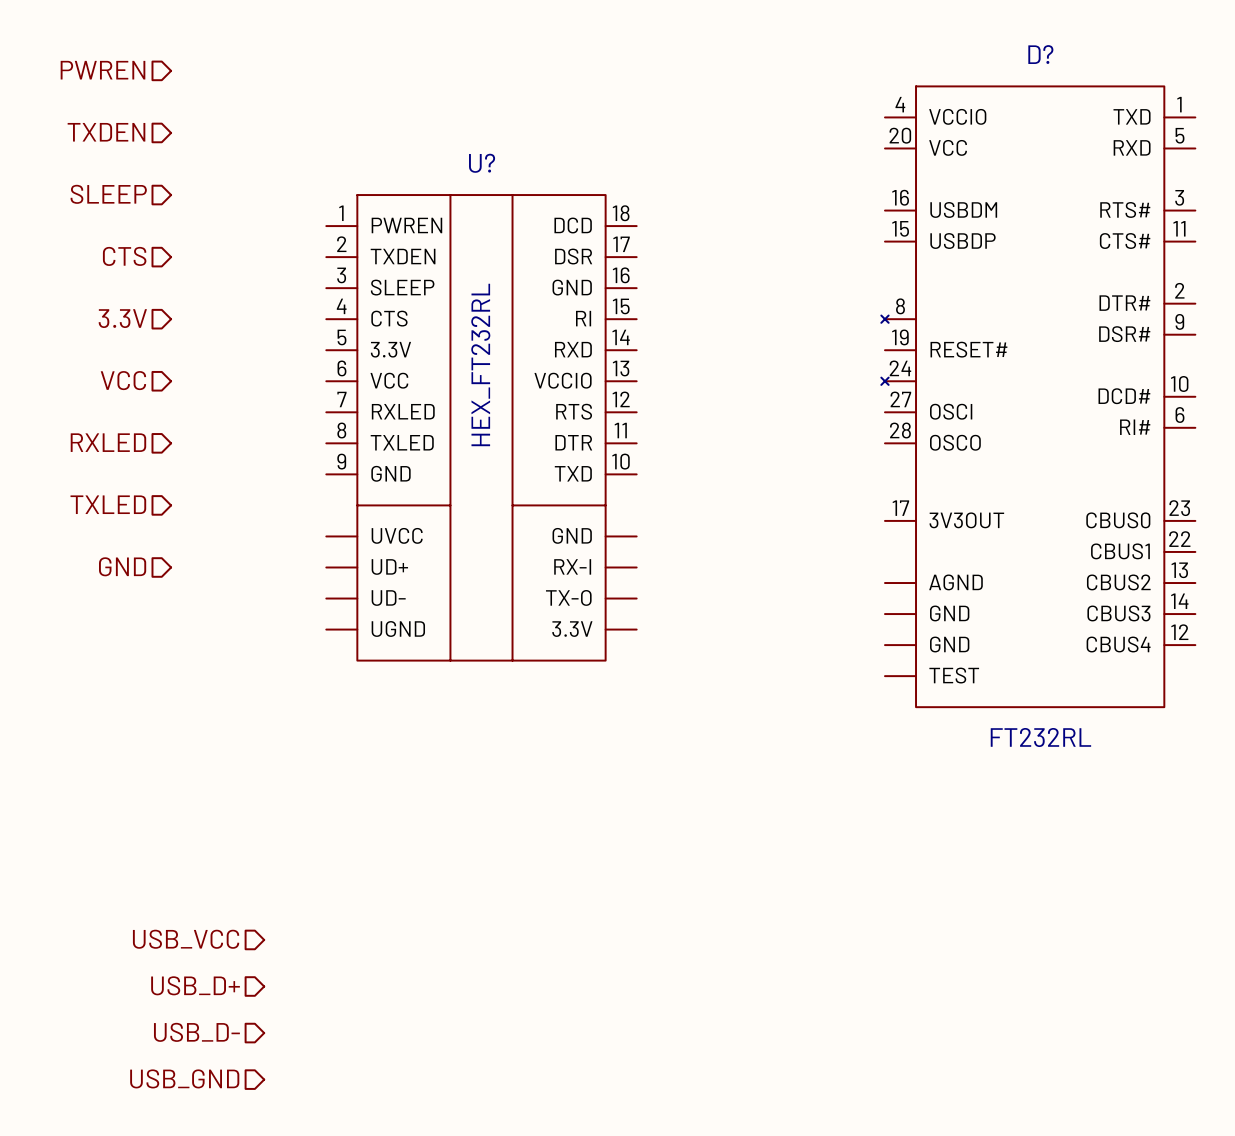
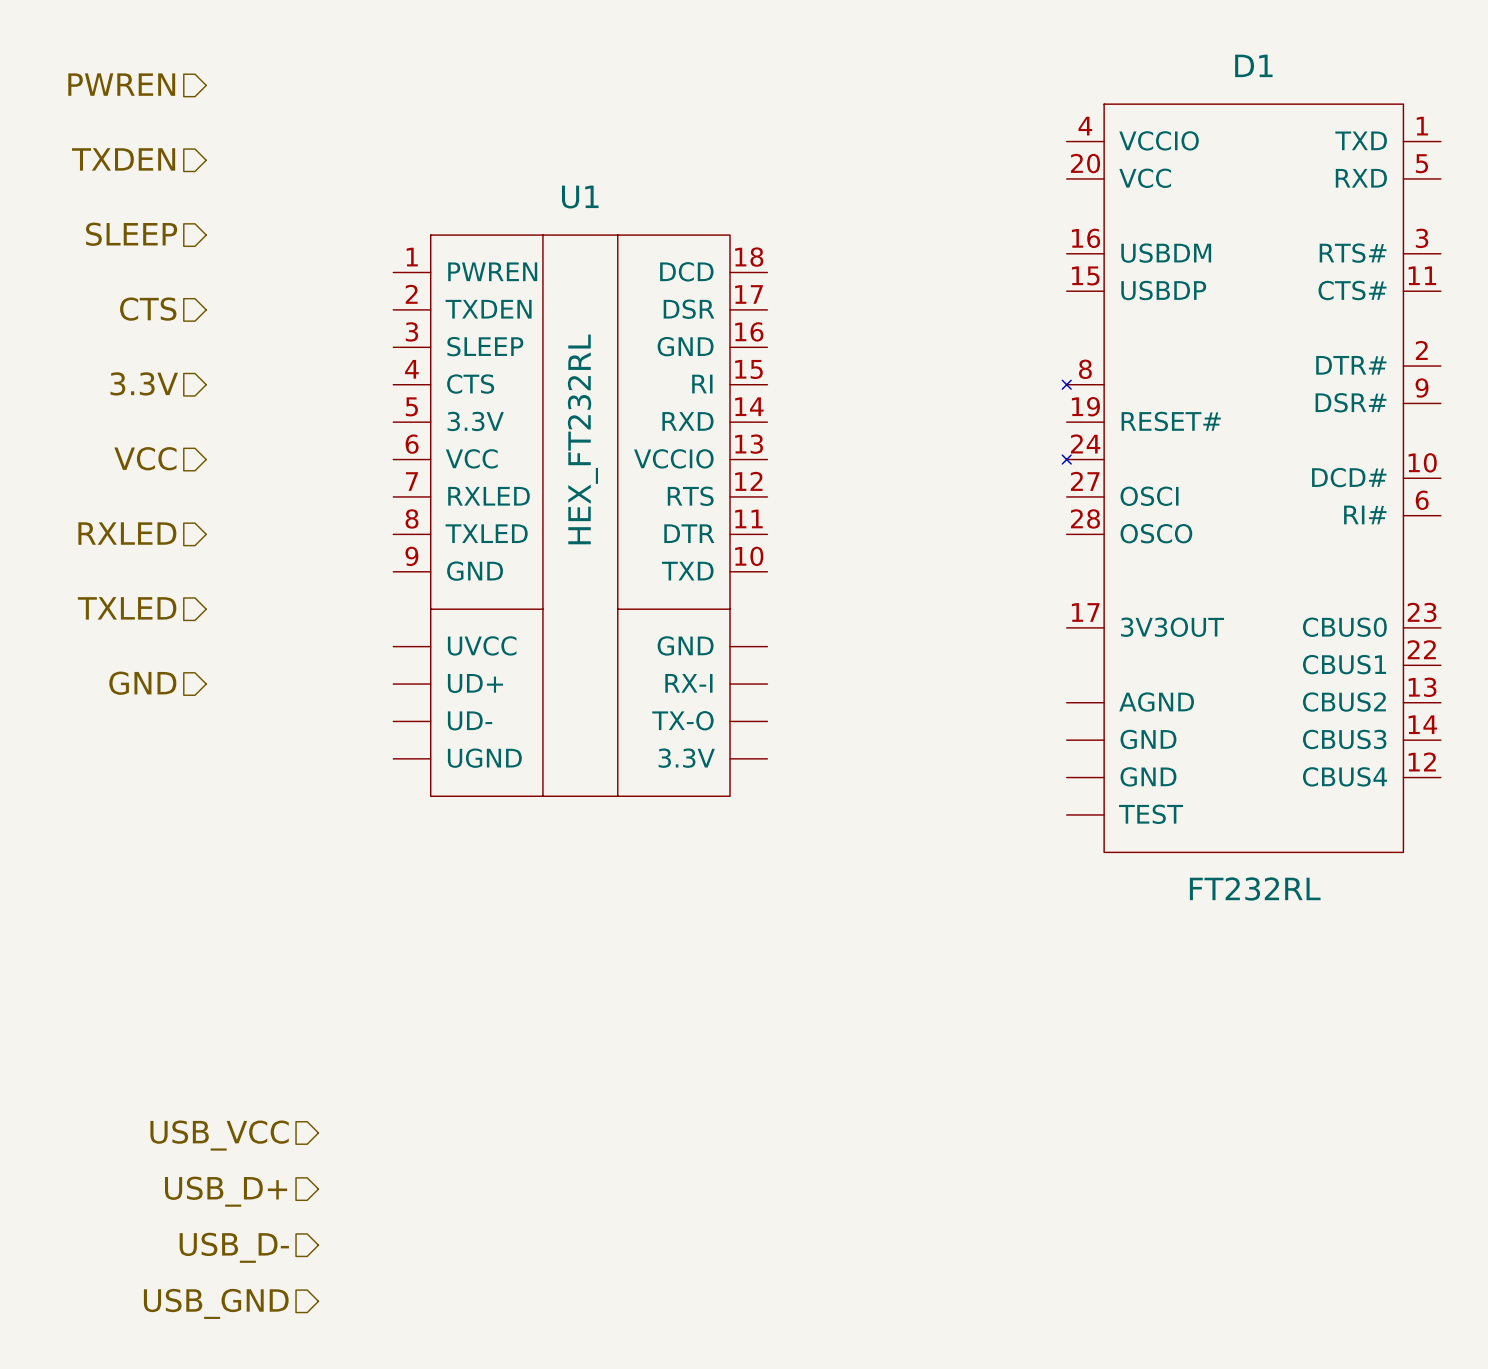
D? name: D? (1040, 54) -> D1 (1253, 65)
U? name: U? (482, 163) -> U1 (580, 197)

